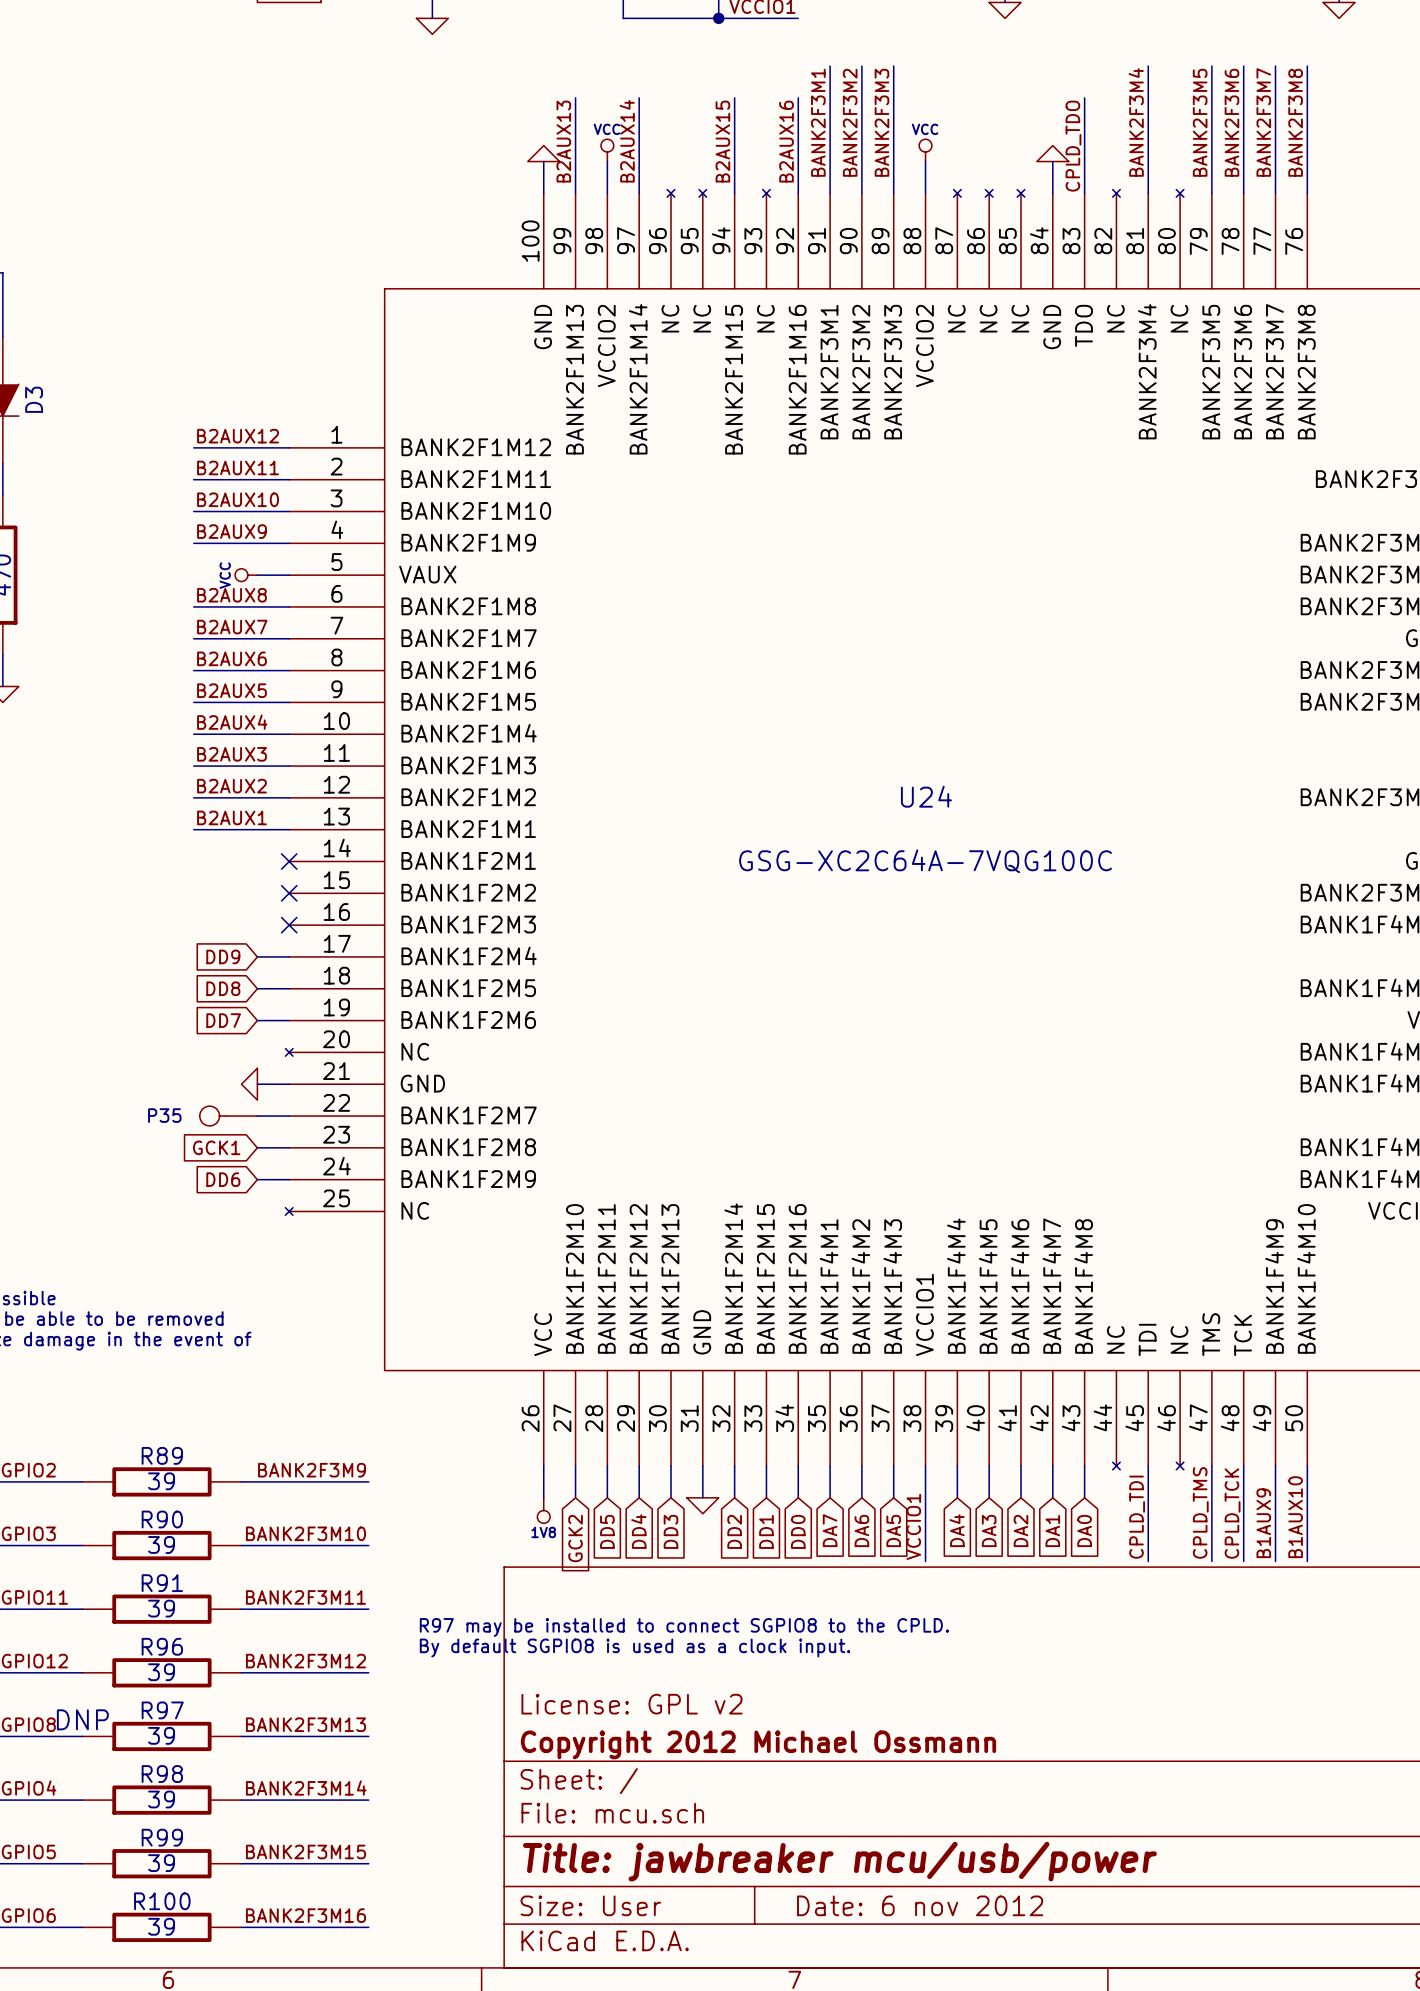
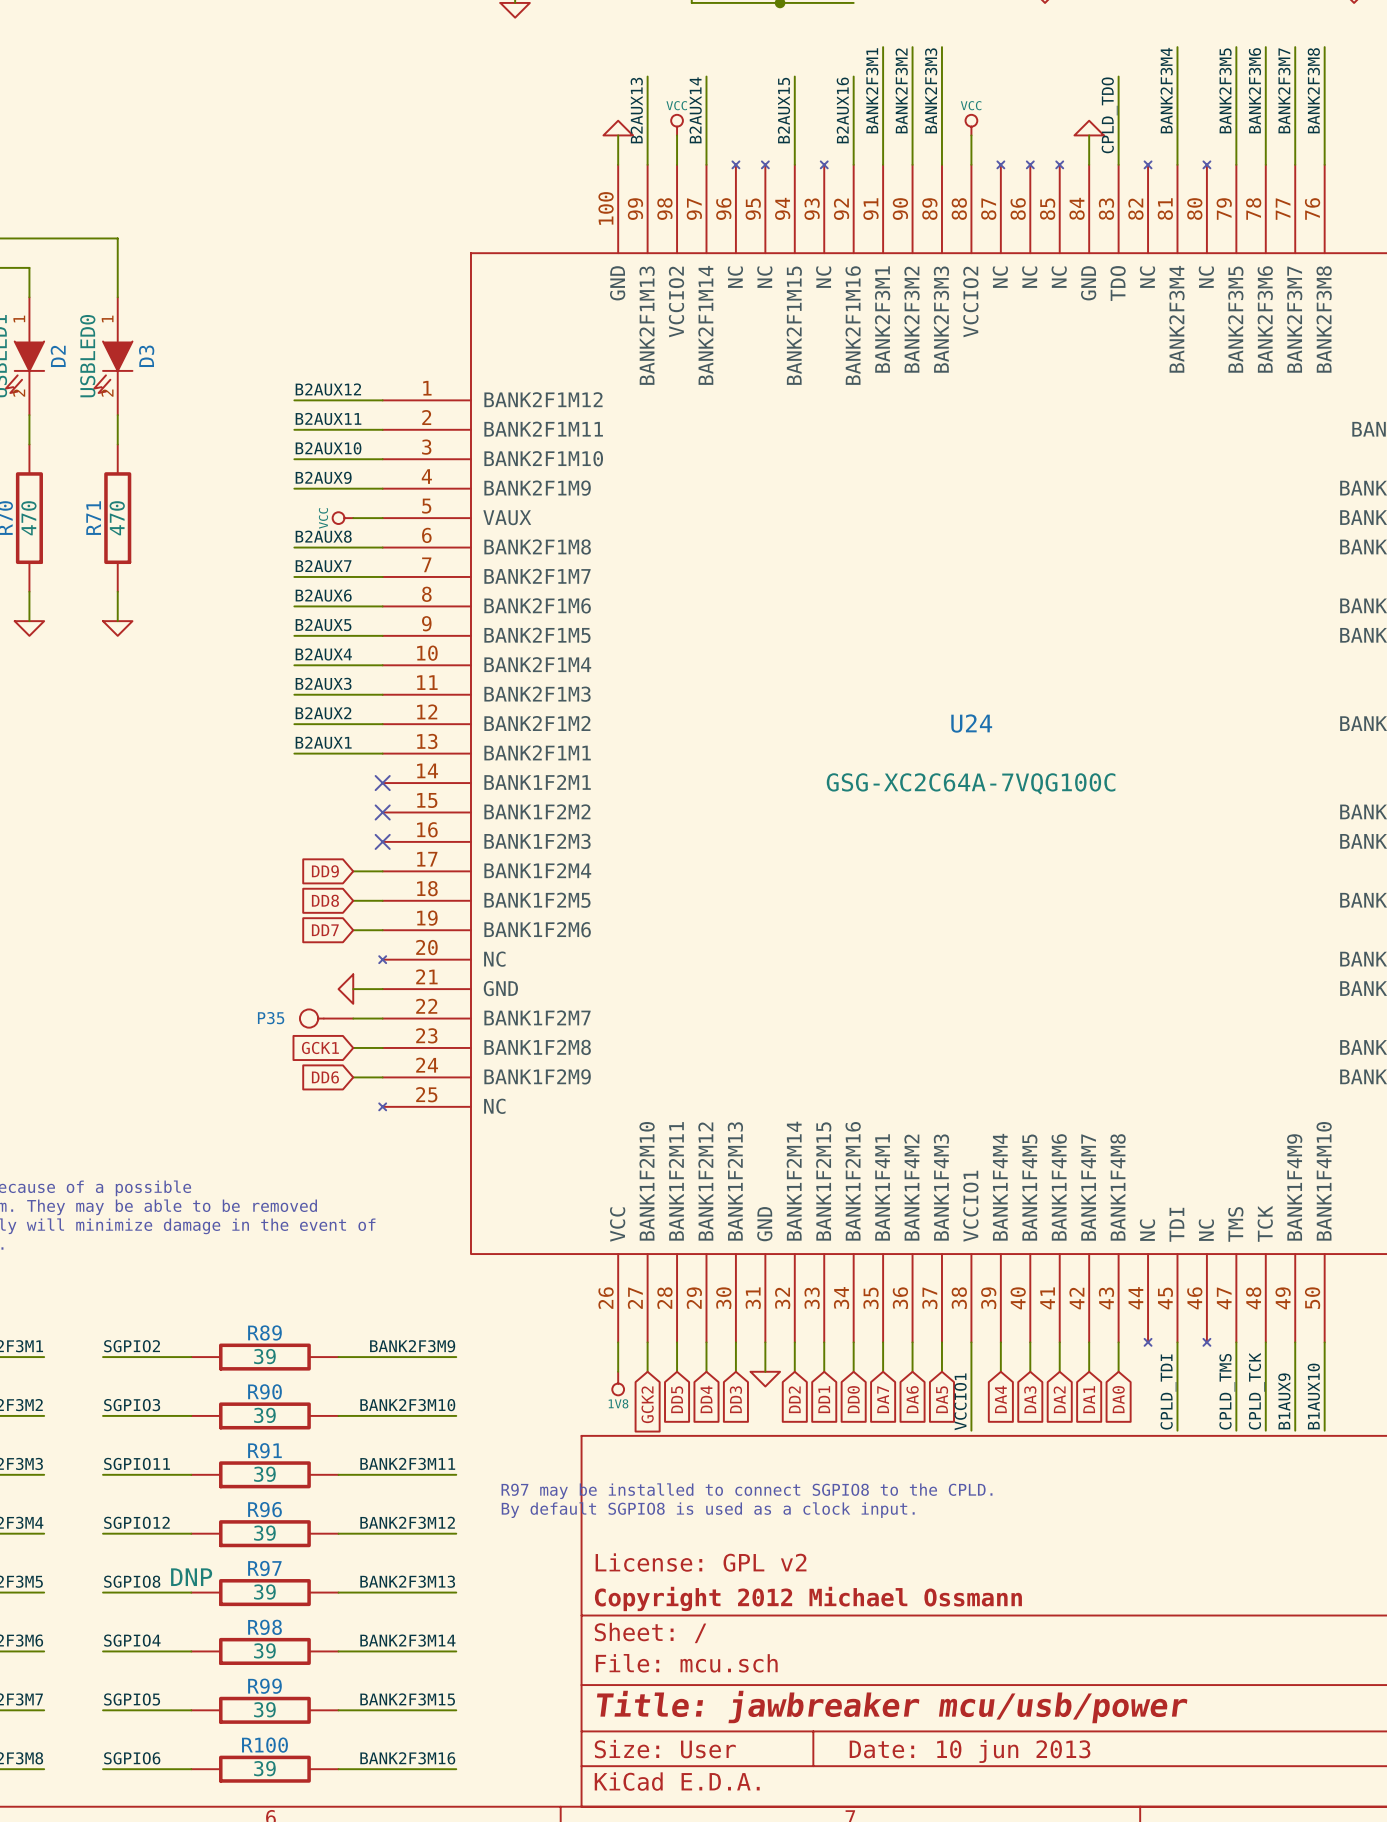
title block: Date: 6 nov 2012 (920, 1905) -> Date: 10 jun 2013 (970, 1751)

